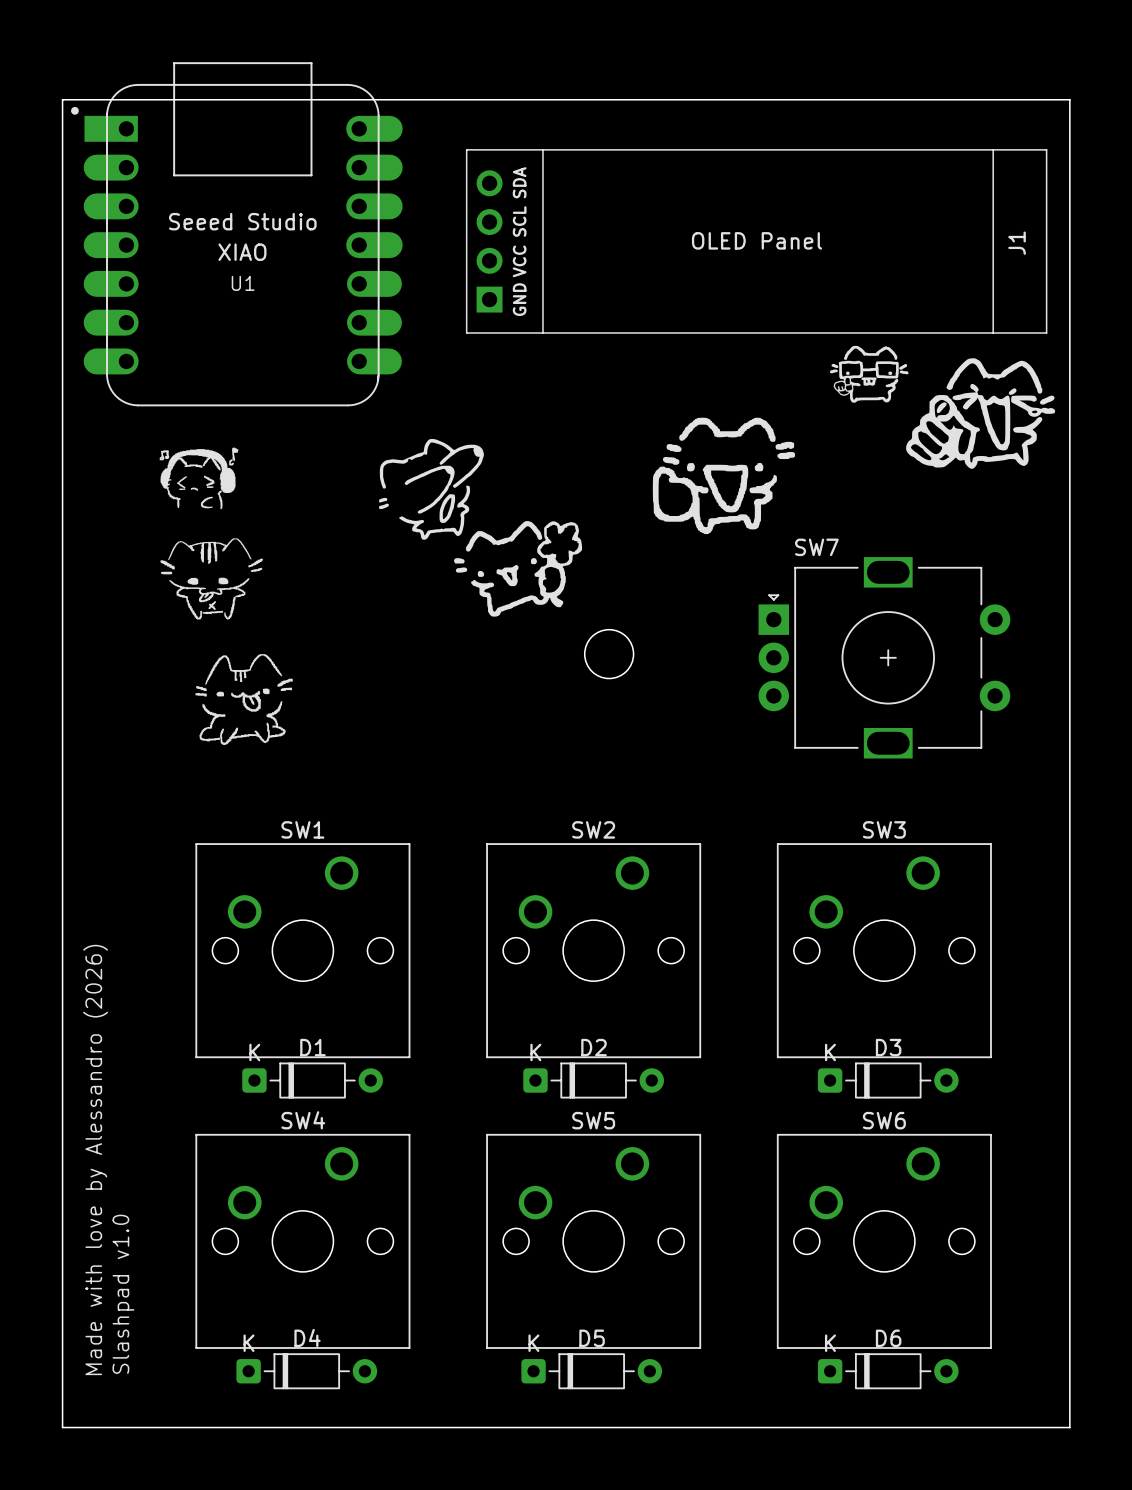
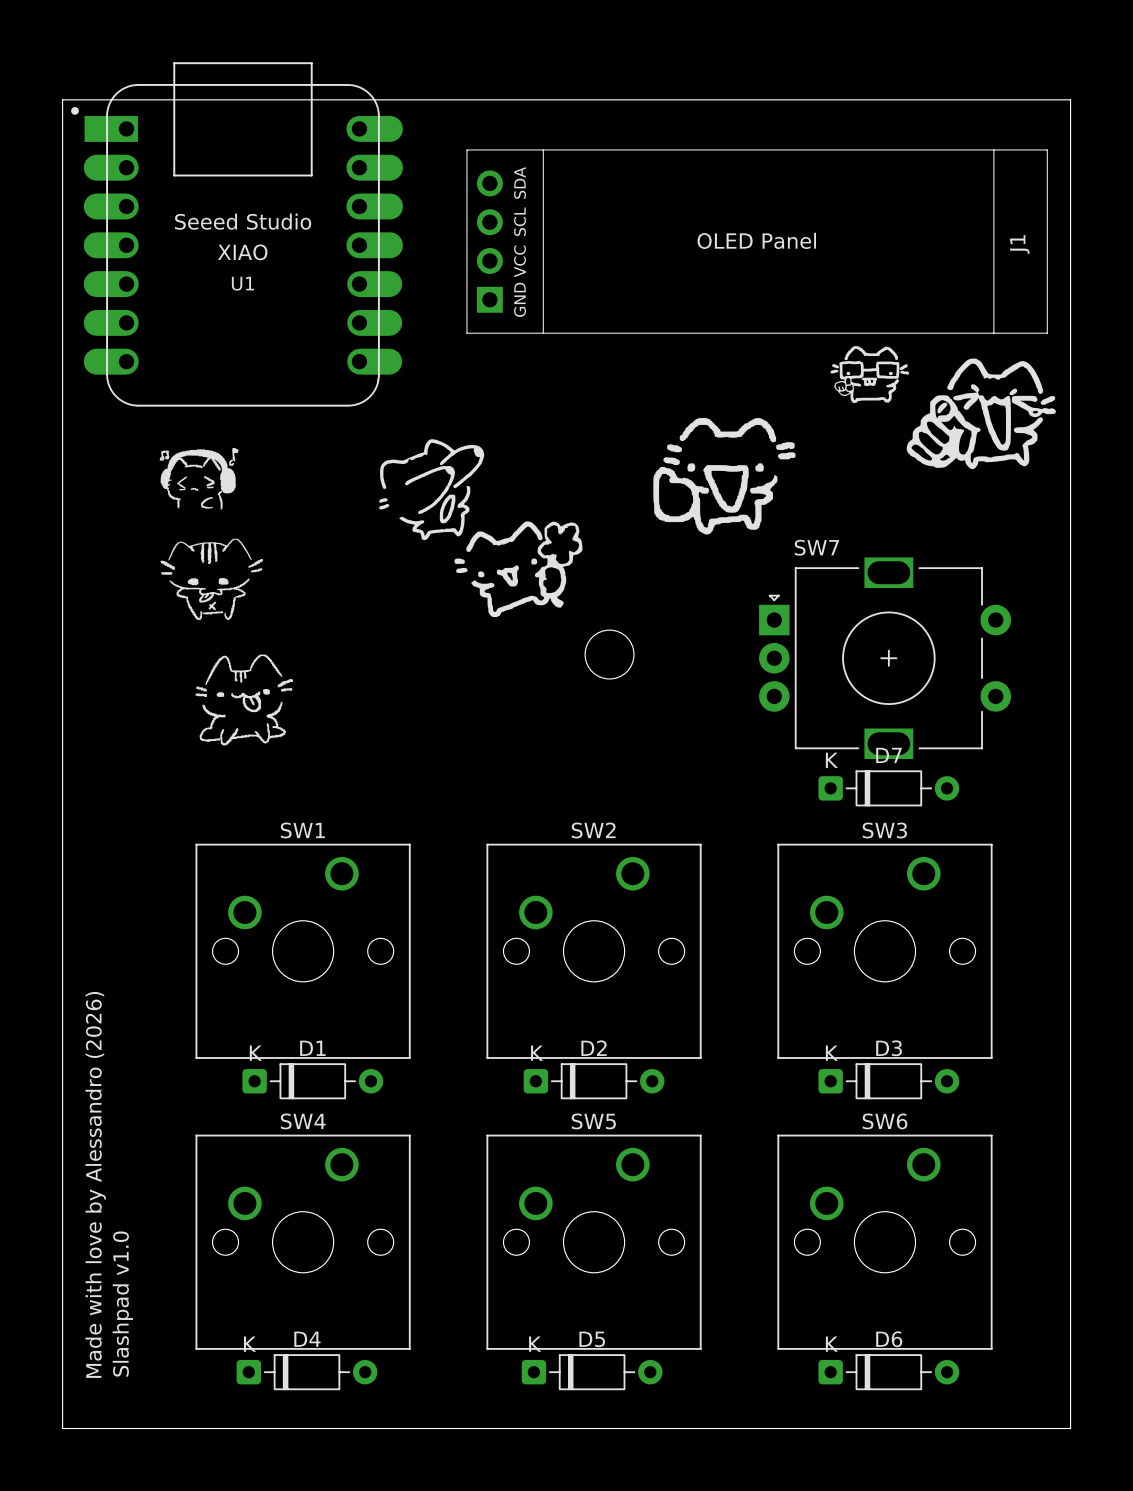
D7: none -> (888, 788)

